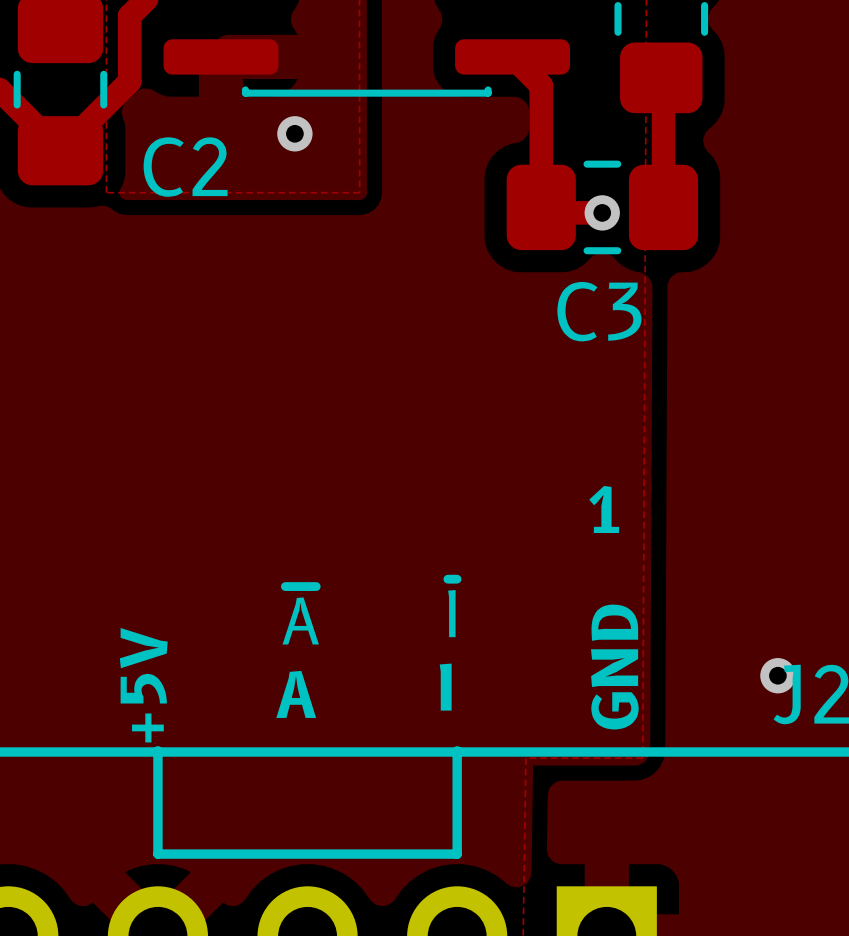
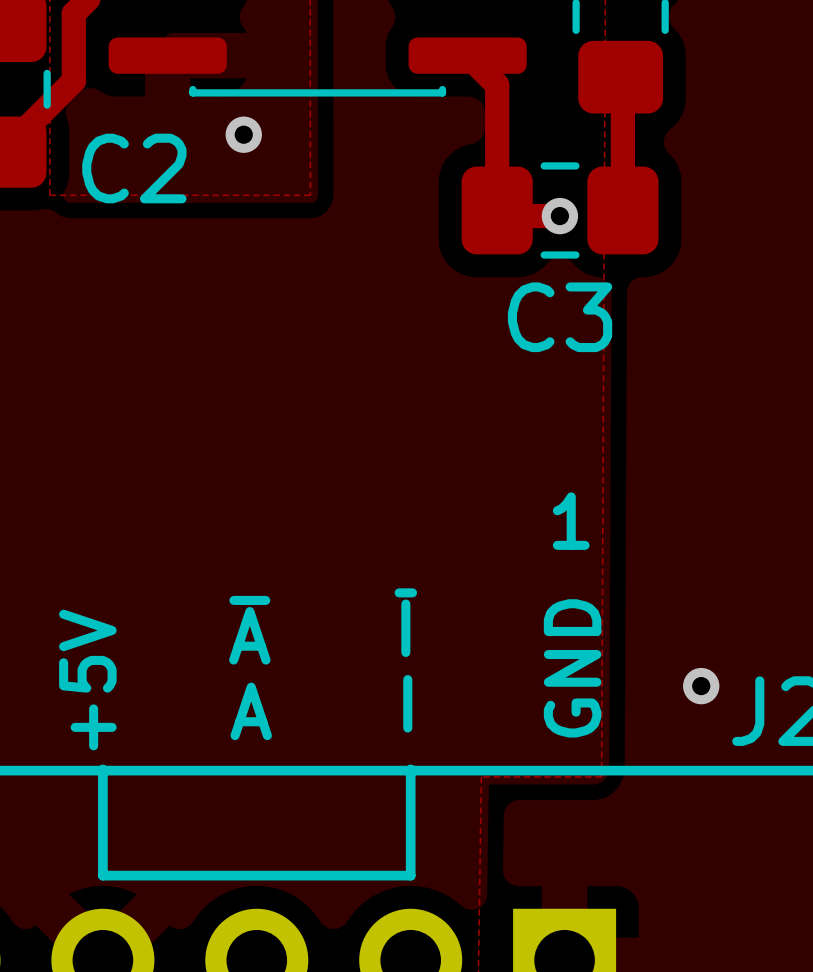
via position: (777, 675) -> (701, 686)

